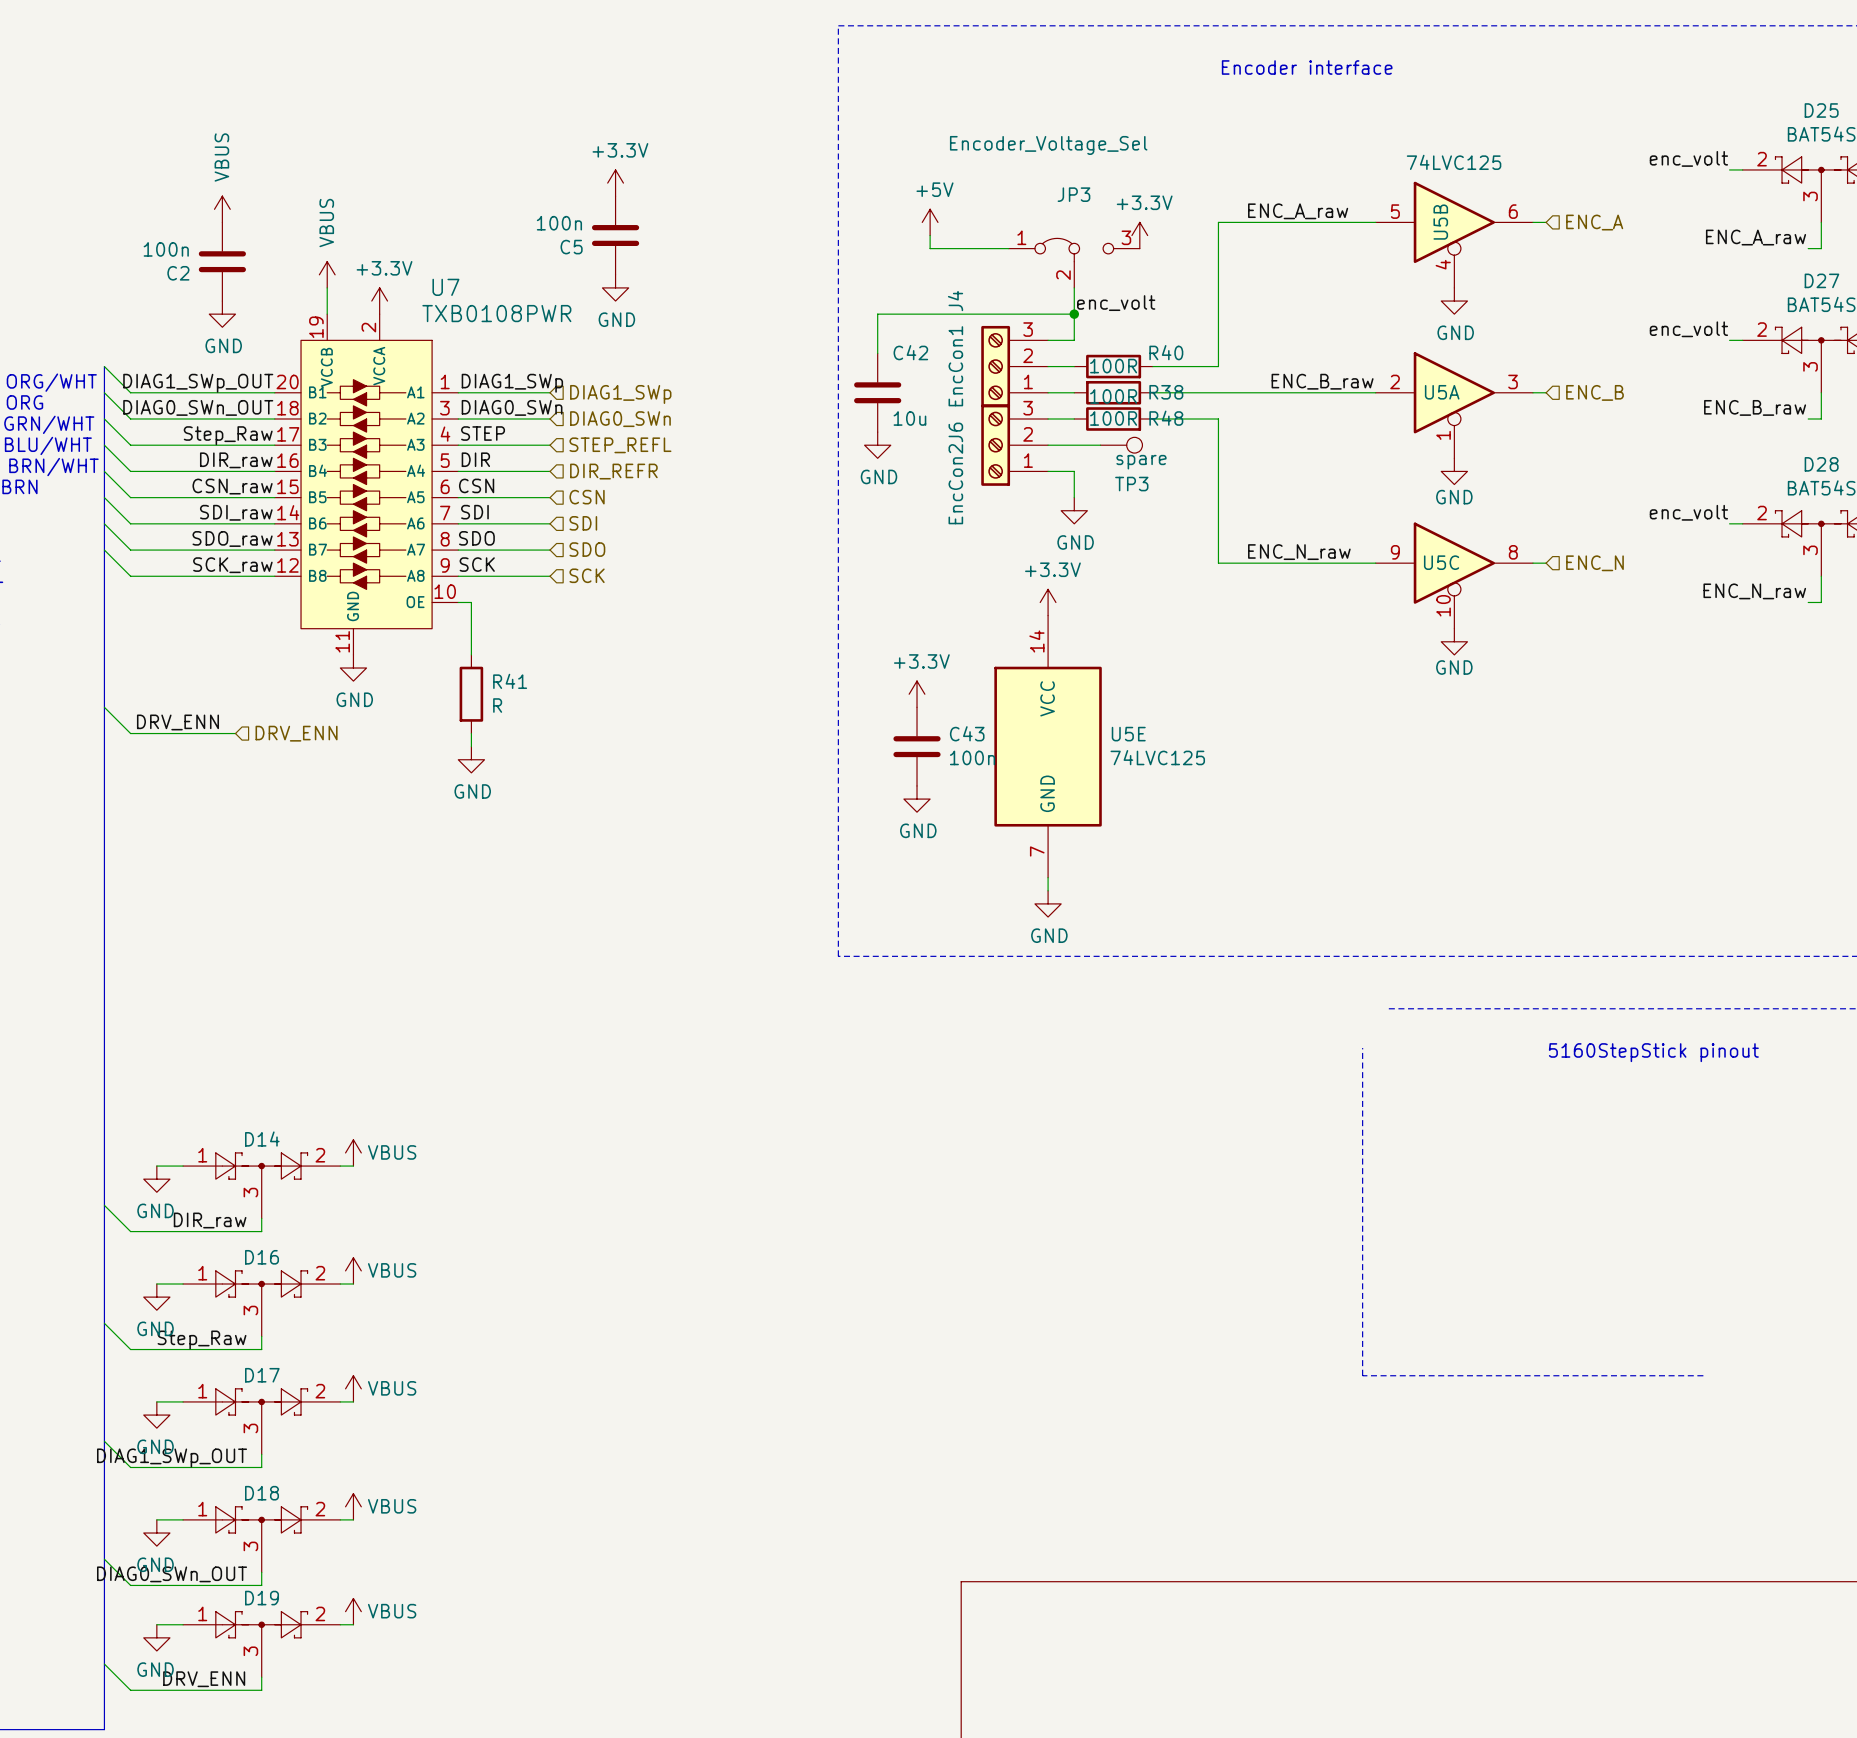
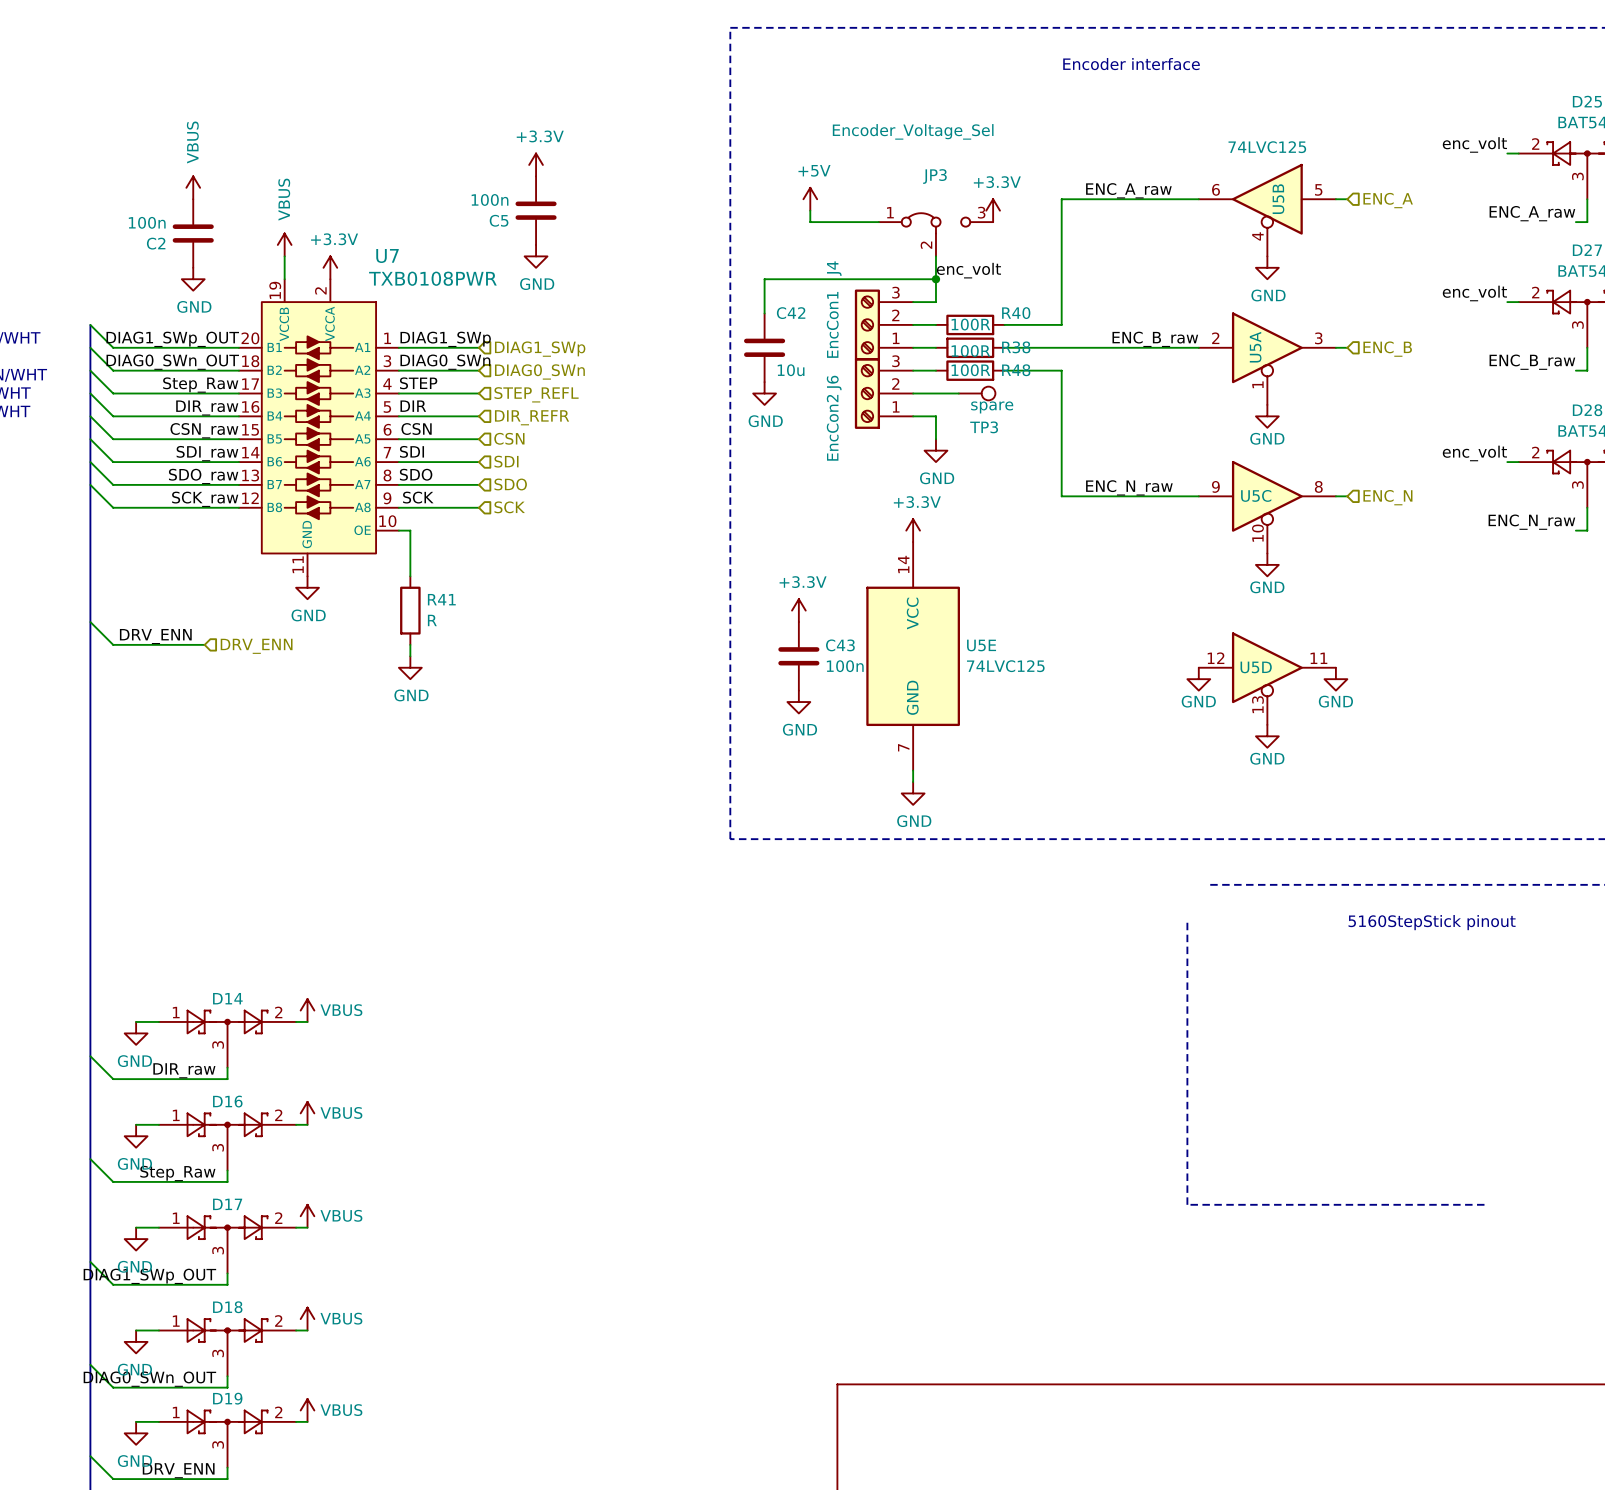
U5B flip: as is (1454, 222) -> left-right (1267, 199)
U5A name rotation: 0° (1442, 392) -> 90° counterclockwise (1255, 347)
power symbol: none -> GND (1198, 679)
U5D: none -> (1267, 678)
power symbol: none -> GND (1335, 679)
power symbol: none -> GND (1267, 736)

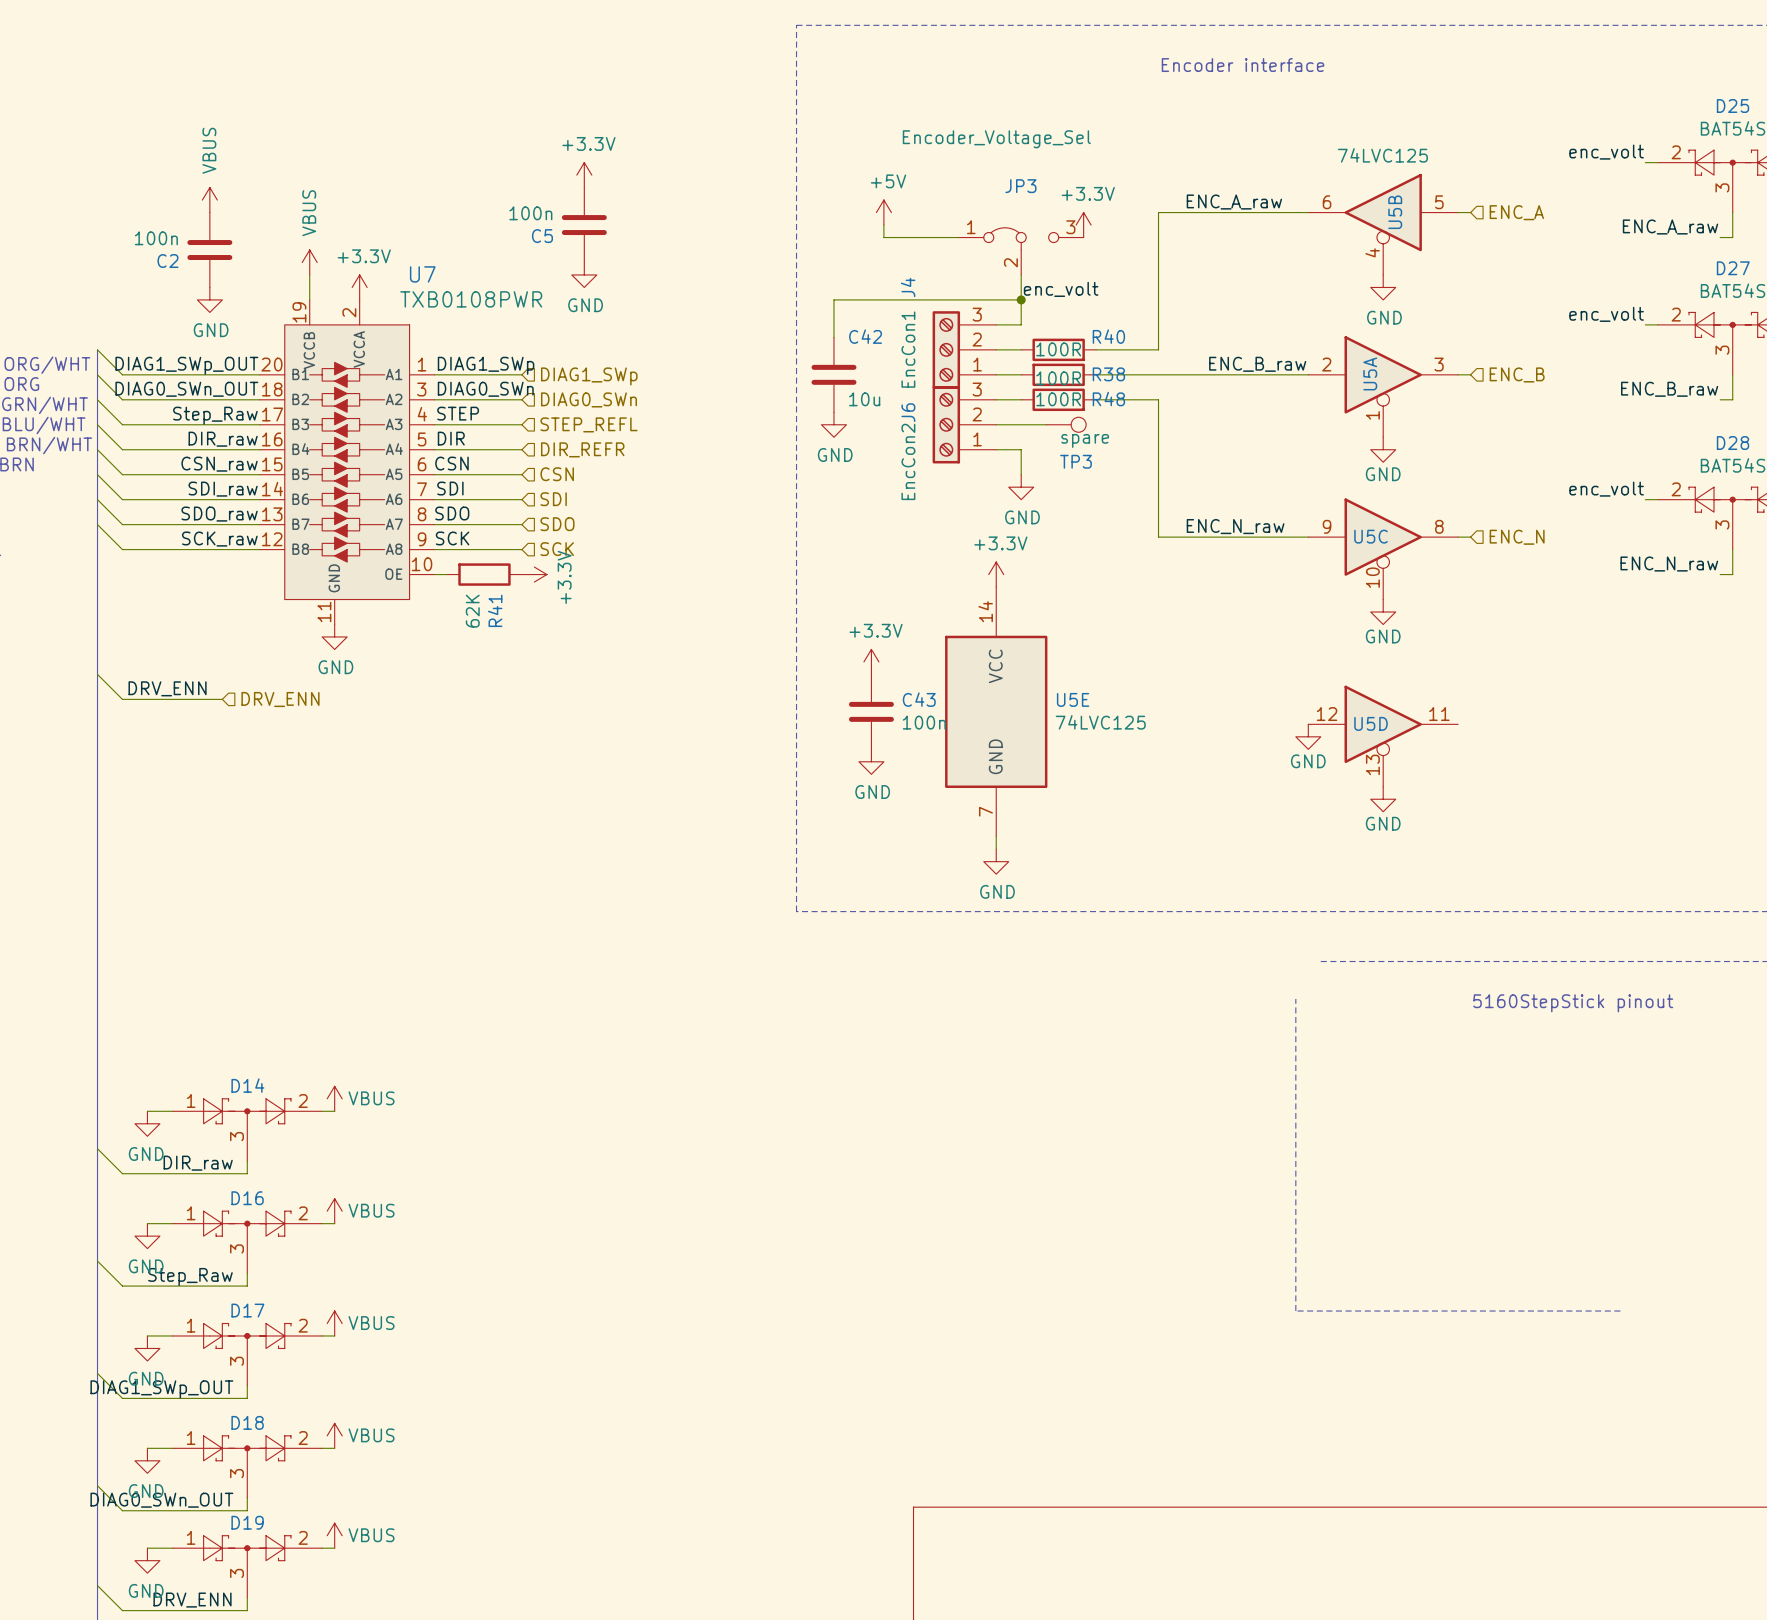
wire: (410, 530) (410, 576) -> none
power symbol: none -> +3.3V (534, 574)
R41 rotation: 0° (410, 610) -> 90° clockwise (484, 574)
R41 position: (410, 610) -> (484, 574)
R41 value: R (432, 620) -> 62K (472, 611)
wire: (410, 644) (410, 656) -> none
power symbol: GND (410, 667) -> none
power symbol: GND (1335, 679) -> none

